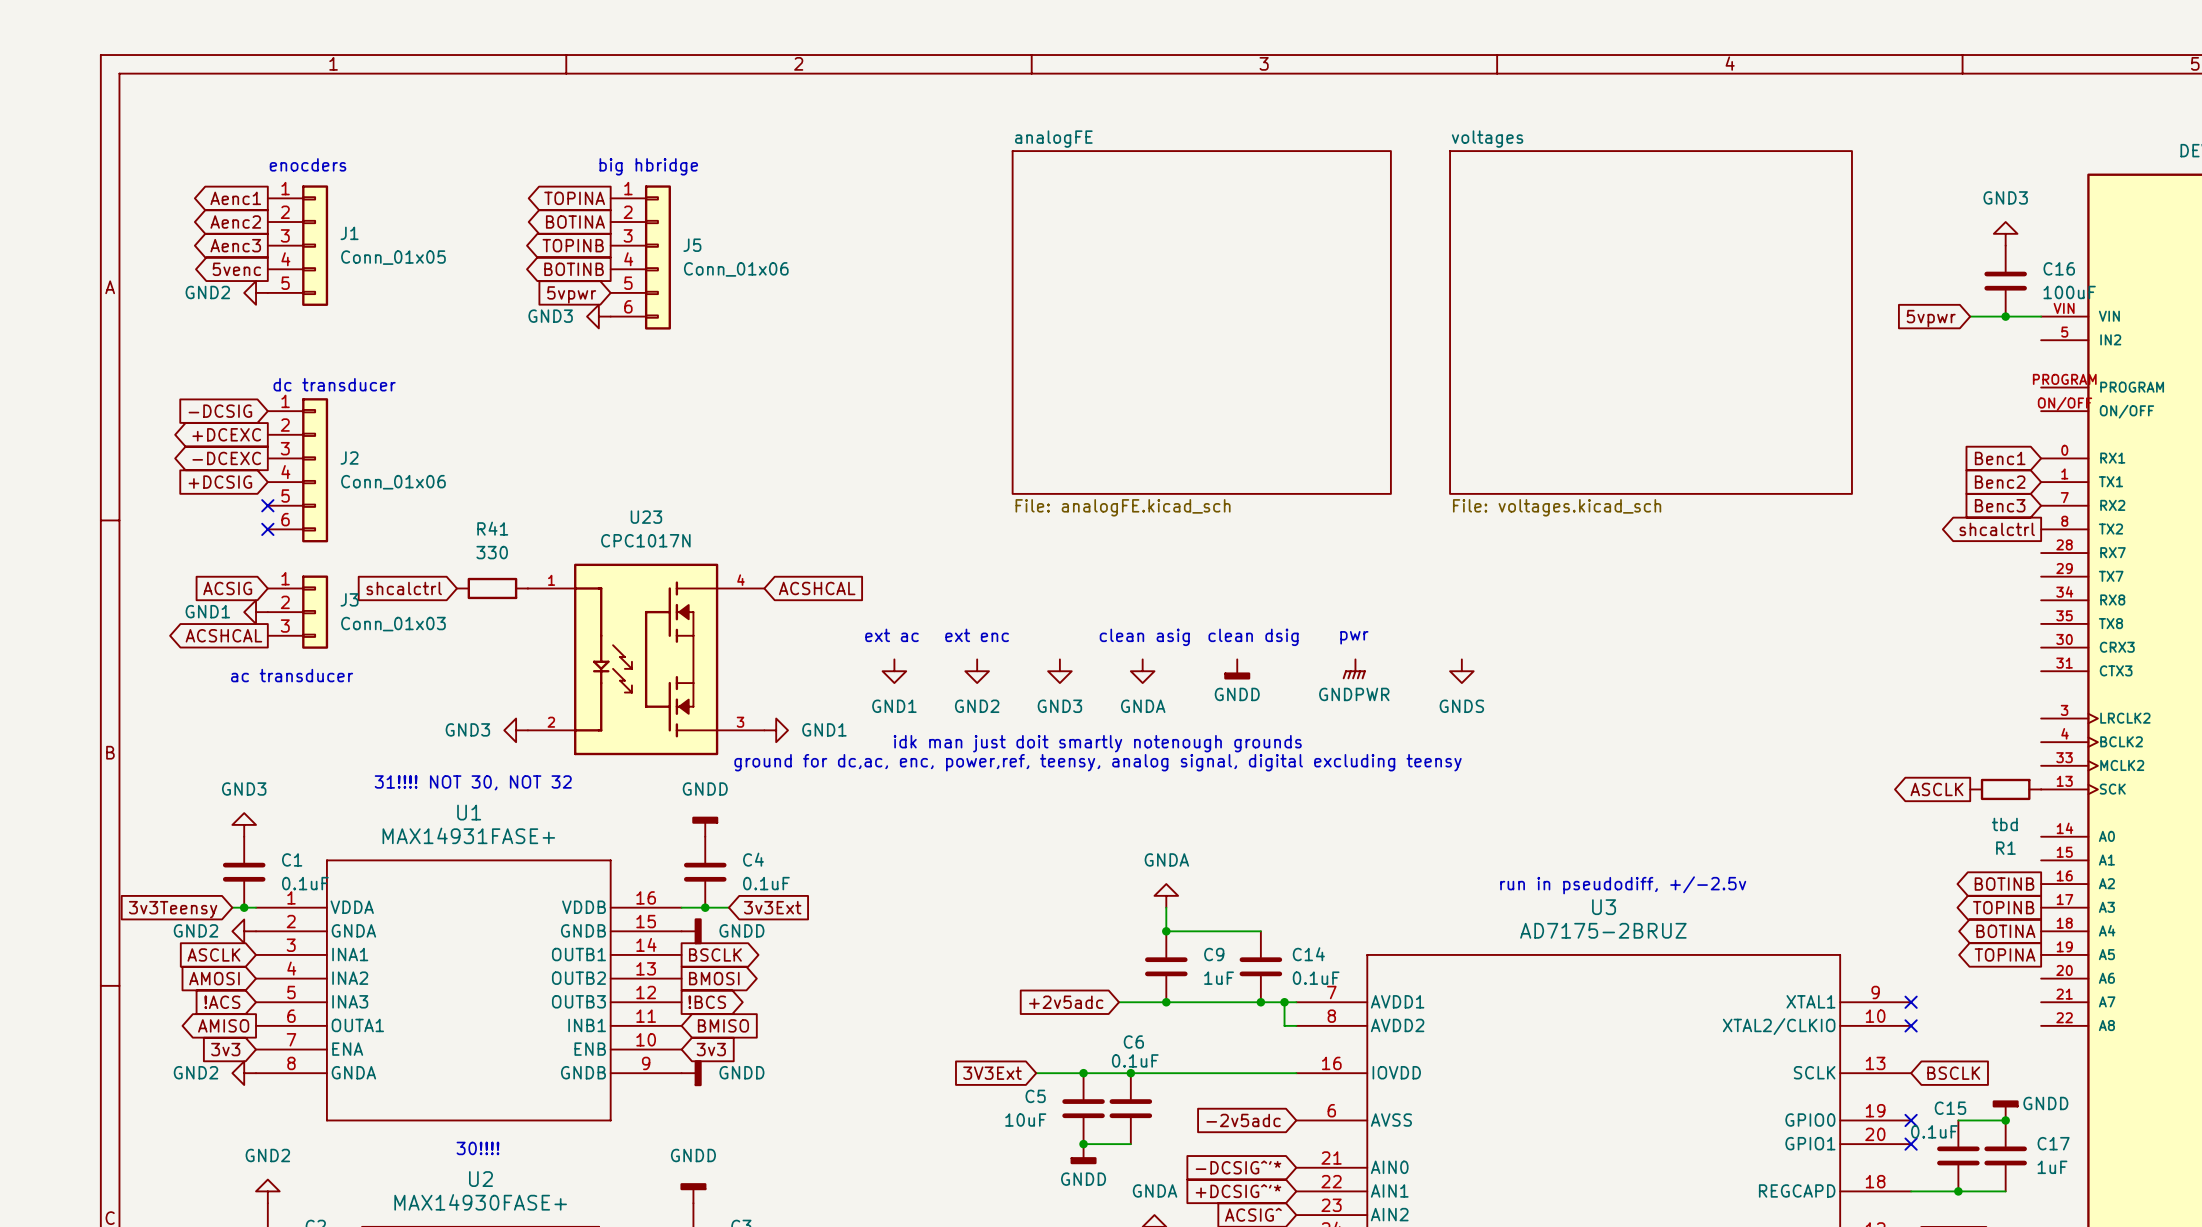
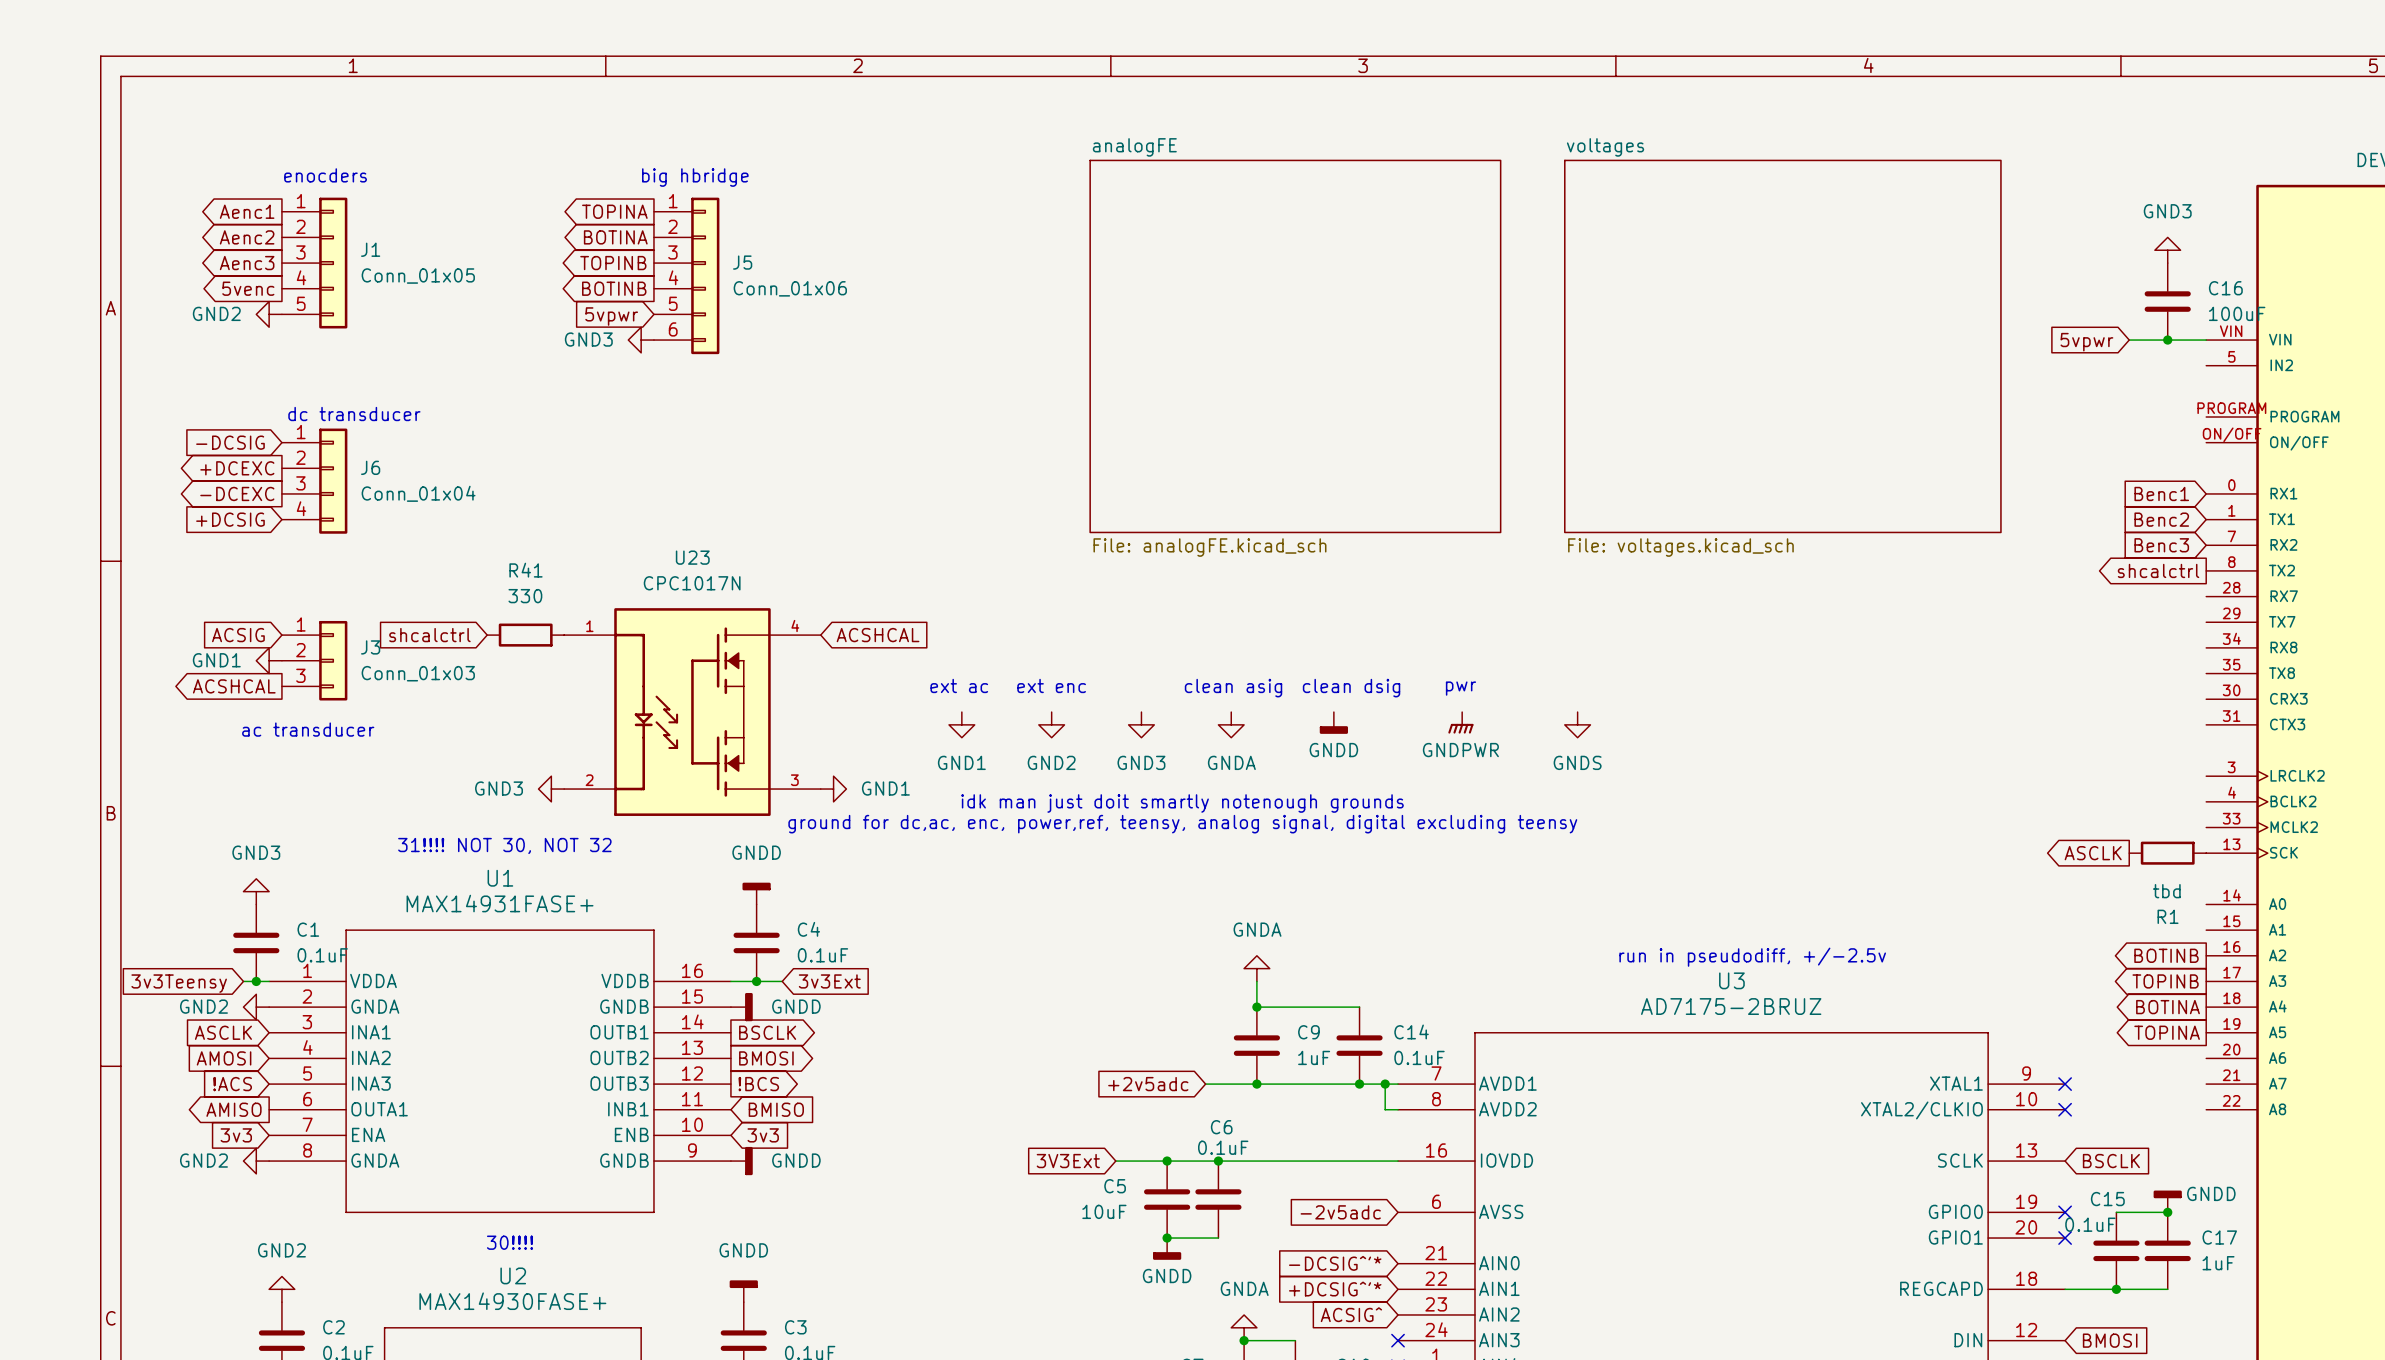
J6: none -> Conn_01x04 (314, 481)
J2: Conn_01x06 (297, 470) -> none
no-connect mark: (267, 505) -> none
no-connect mark: (267, 529) -> none

